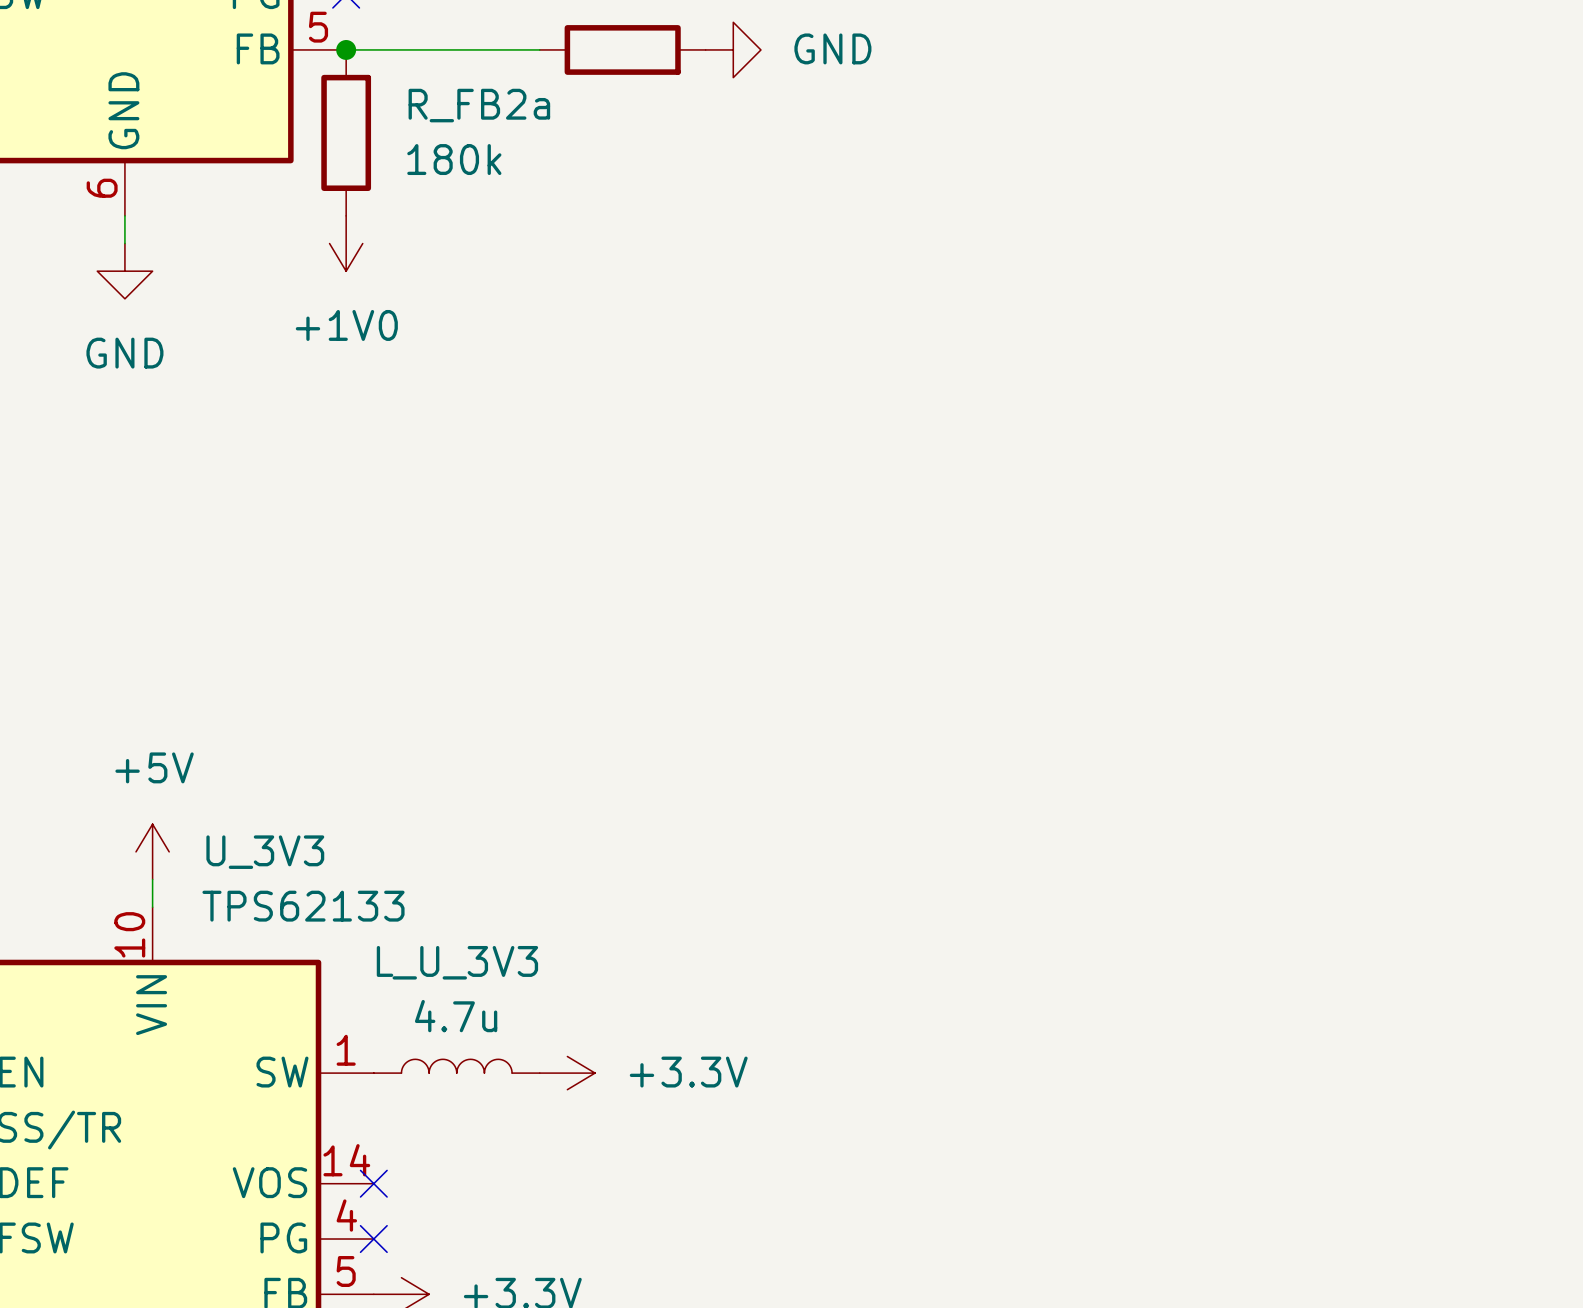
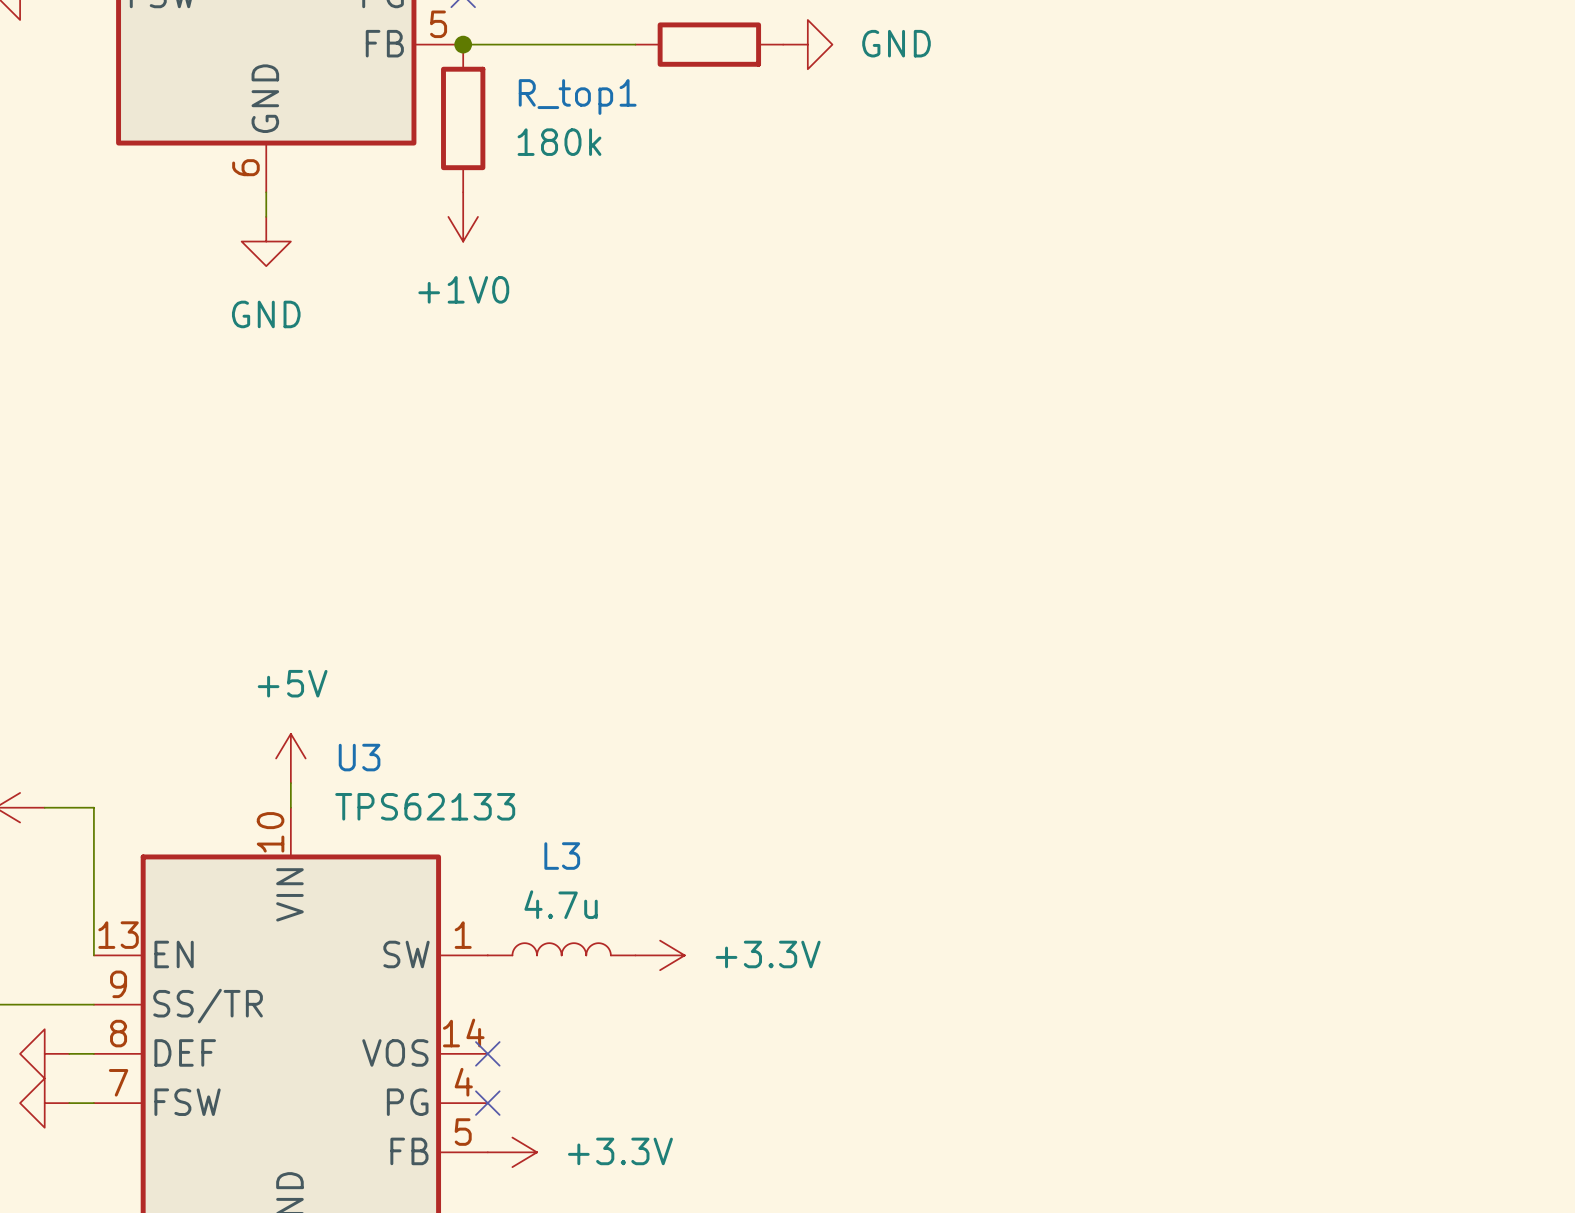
R_FB2a name: R_FB2a (479, 105) -> R_top1 (577, 97)
U_3V3 name: U_3V3 (265, 852) -> U3 (359, 757)
L_U_3V3 name: L_U_3V3 (457, 962) -> L3 (562, 856)

